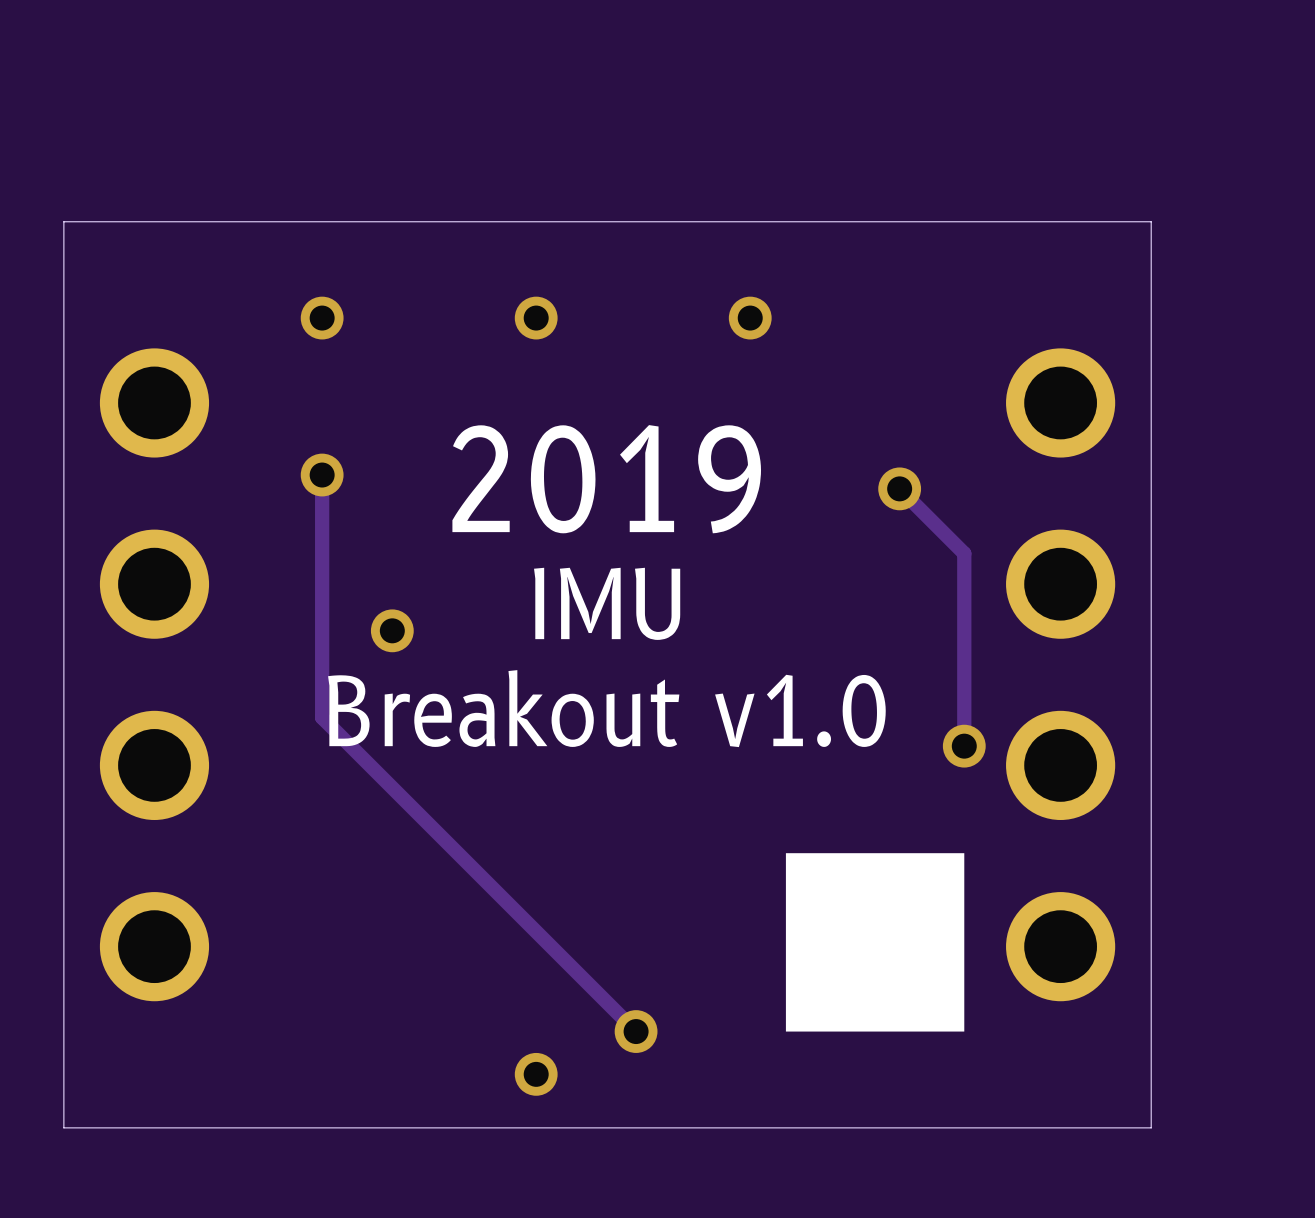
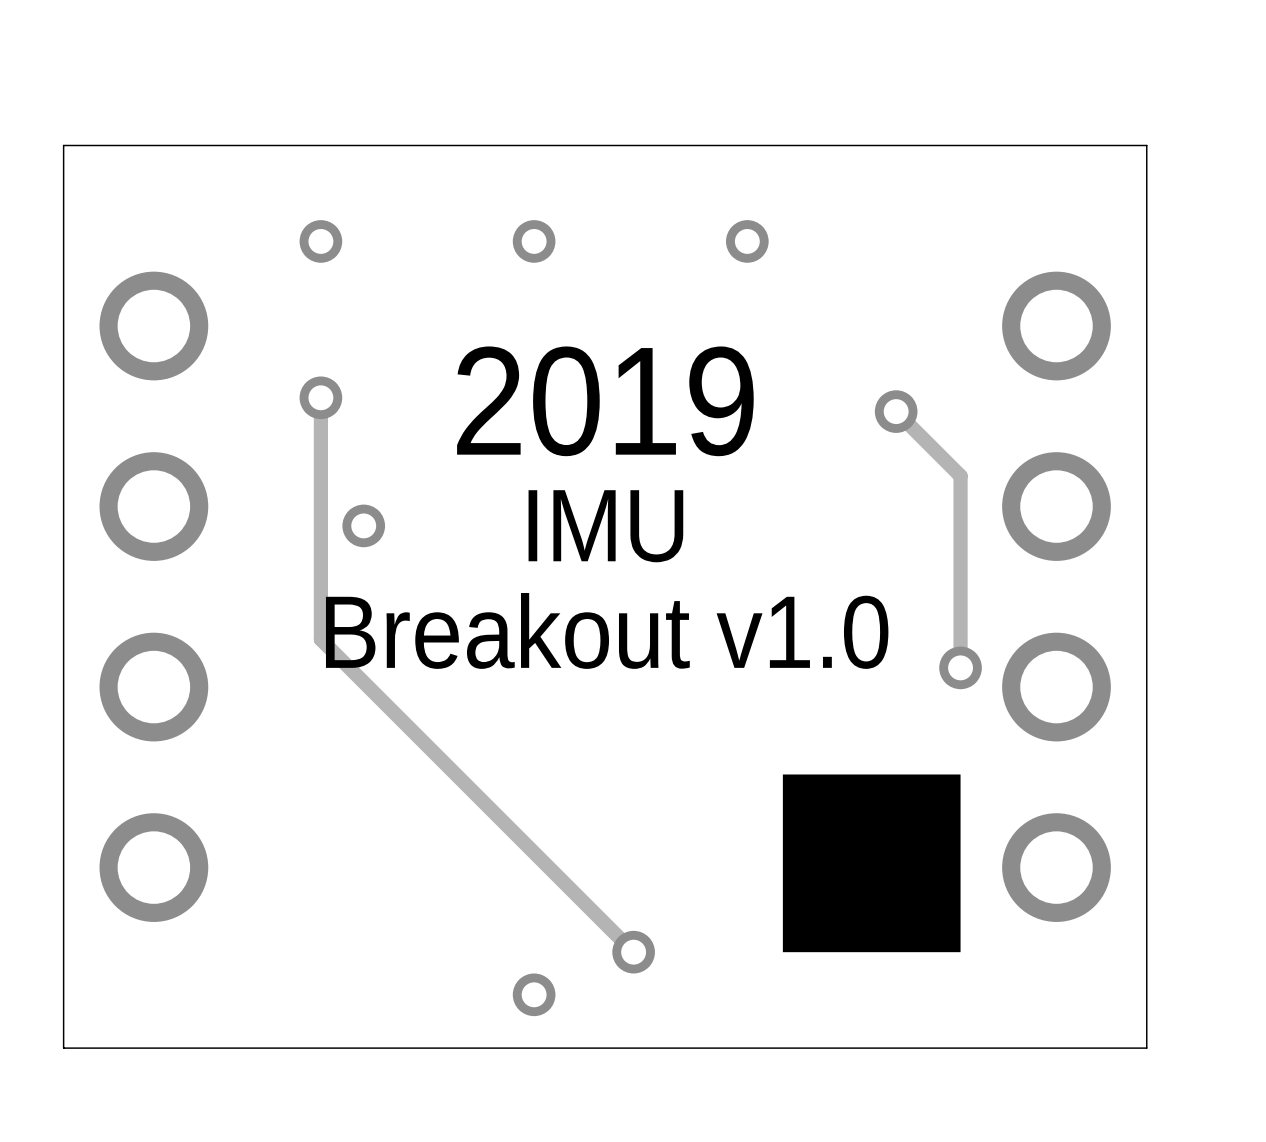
via position: (392, 630) -> (363, 525)

